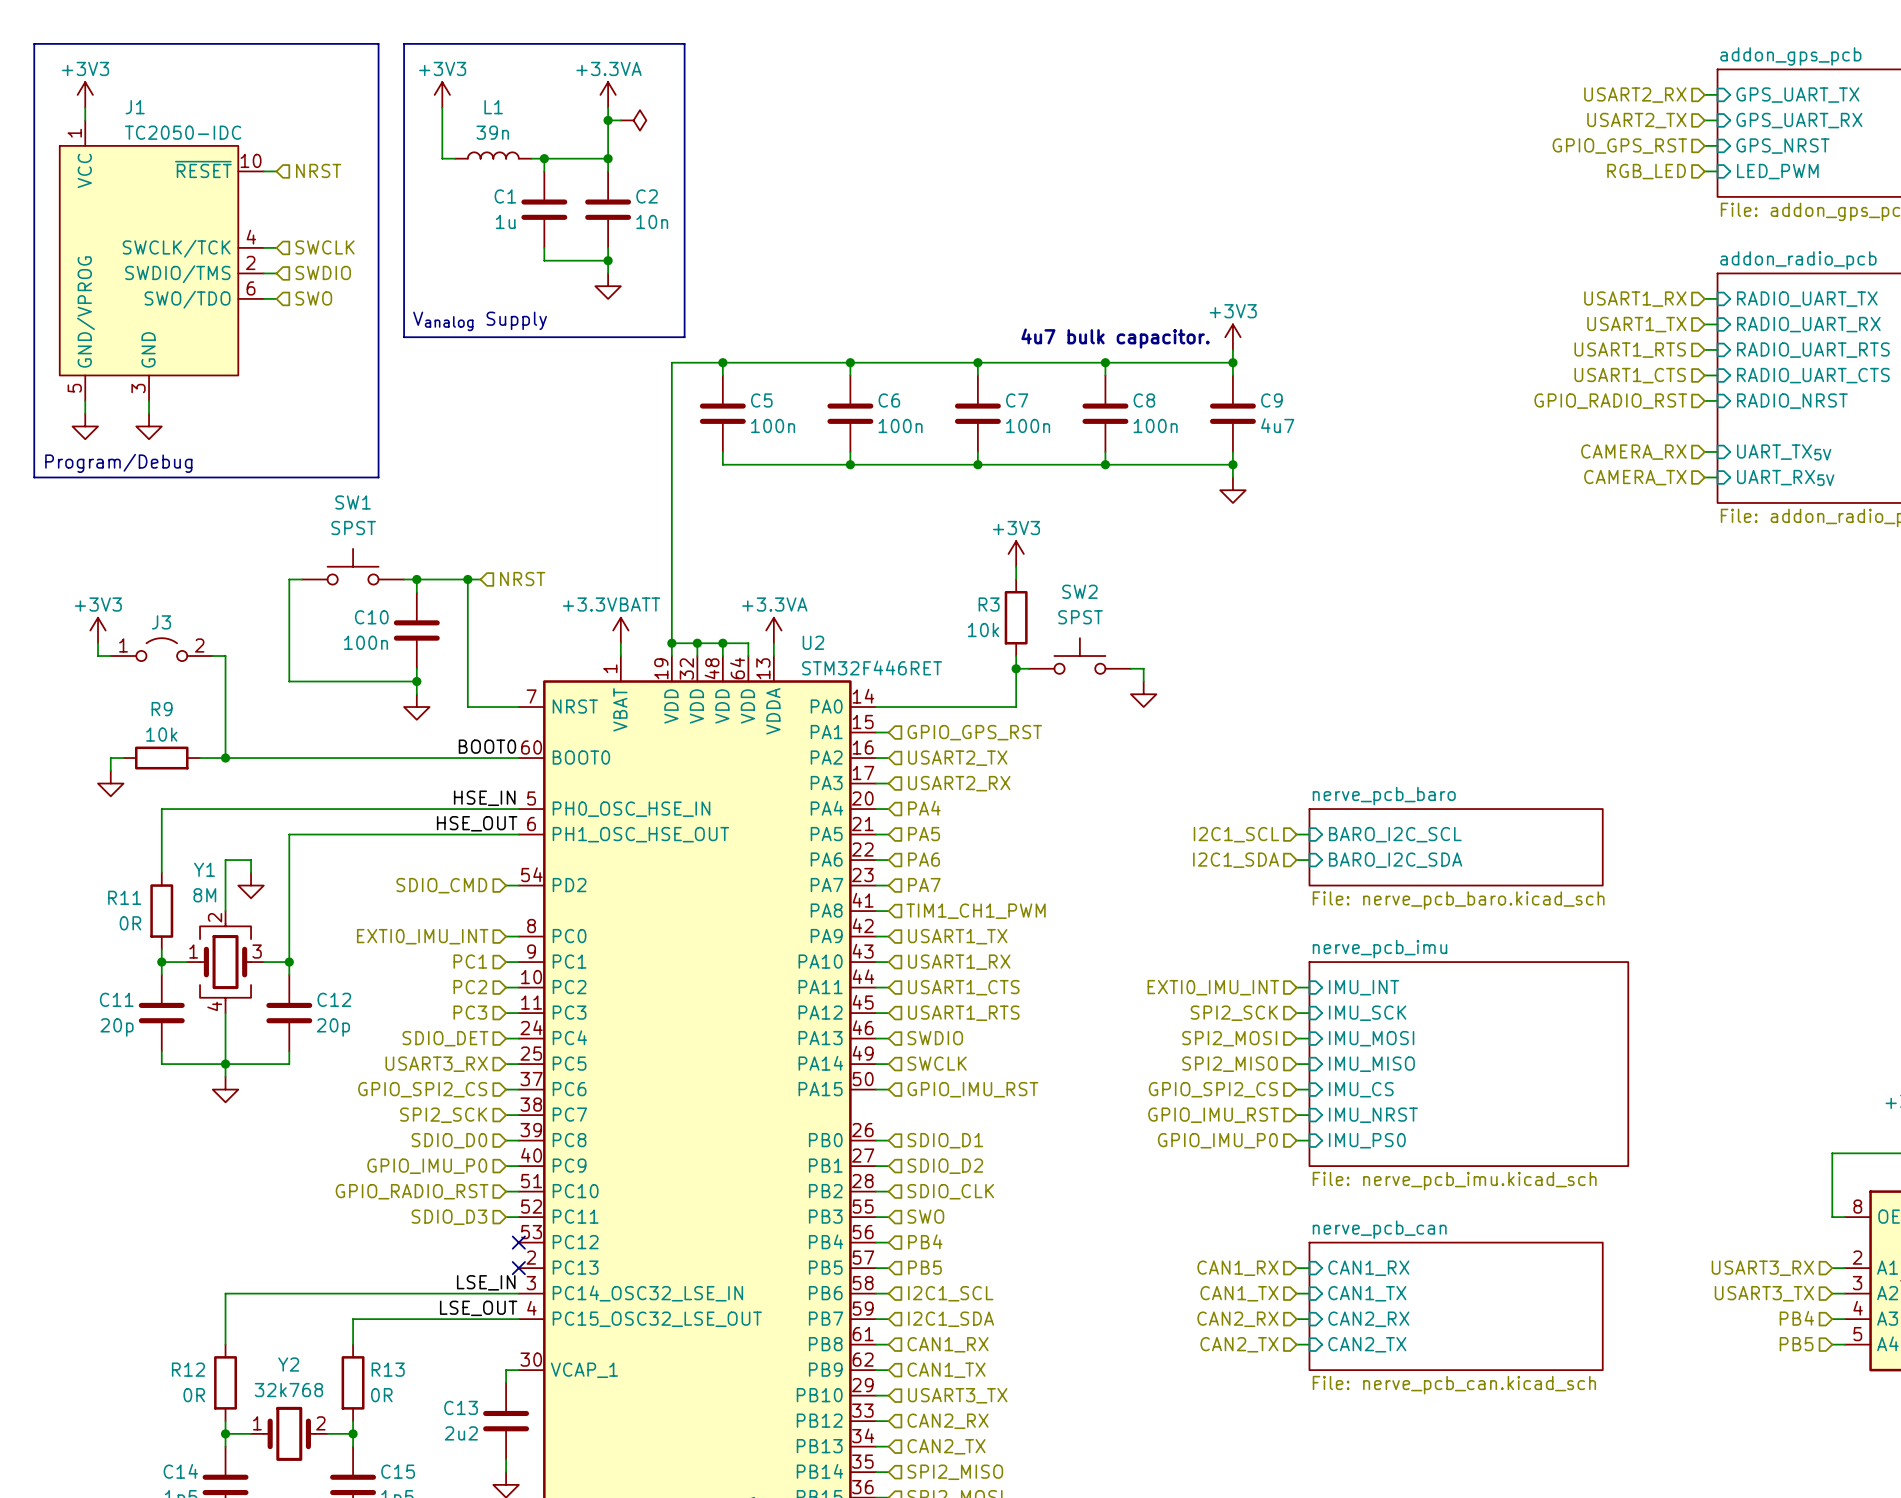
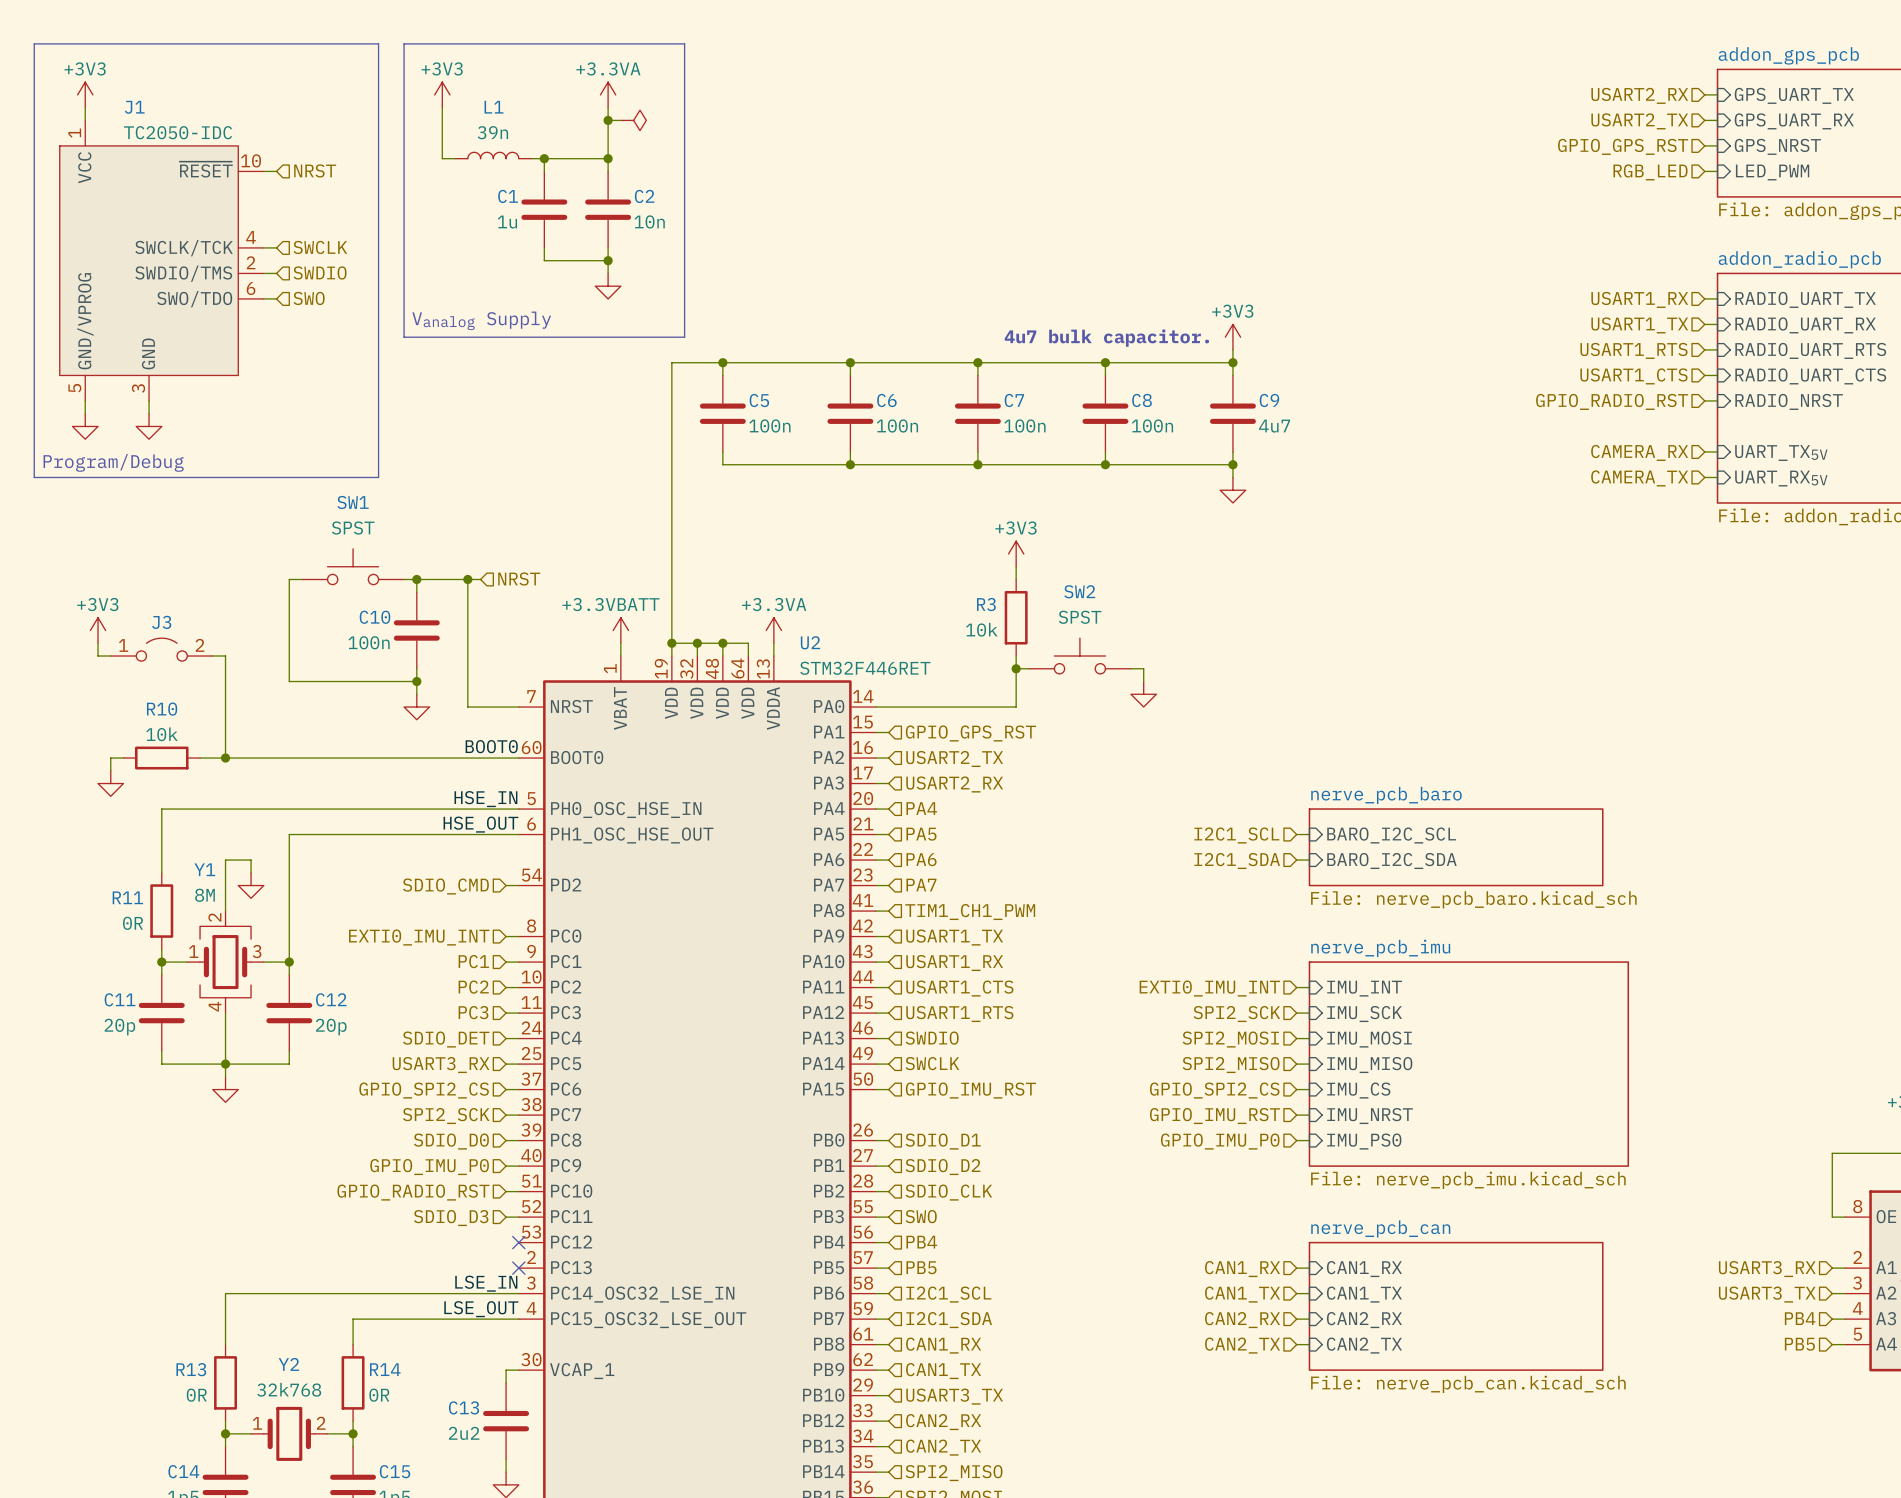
R9 name: R9 (162, 709) -> R10 (162, 709)
R12 name: R12 (188, 1369) -> R13 (191, 1369)
R13 name: R13 (388, 1369) -> R14 (385, 1369)

